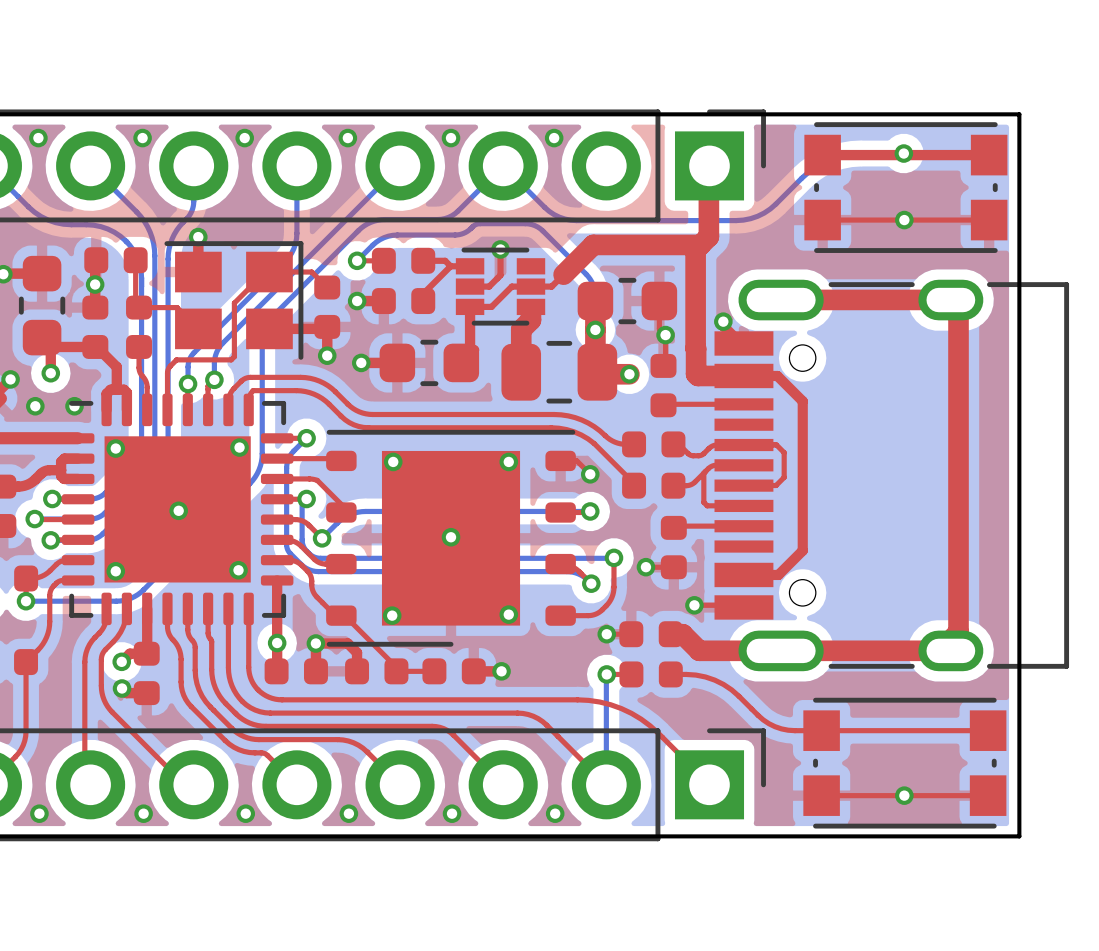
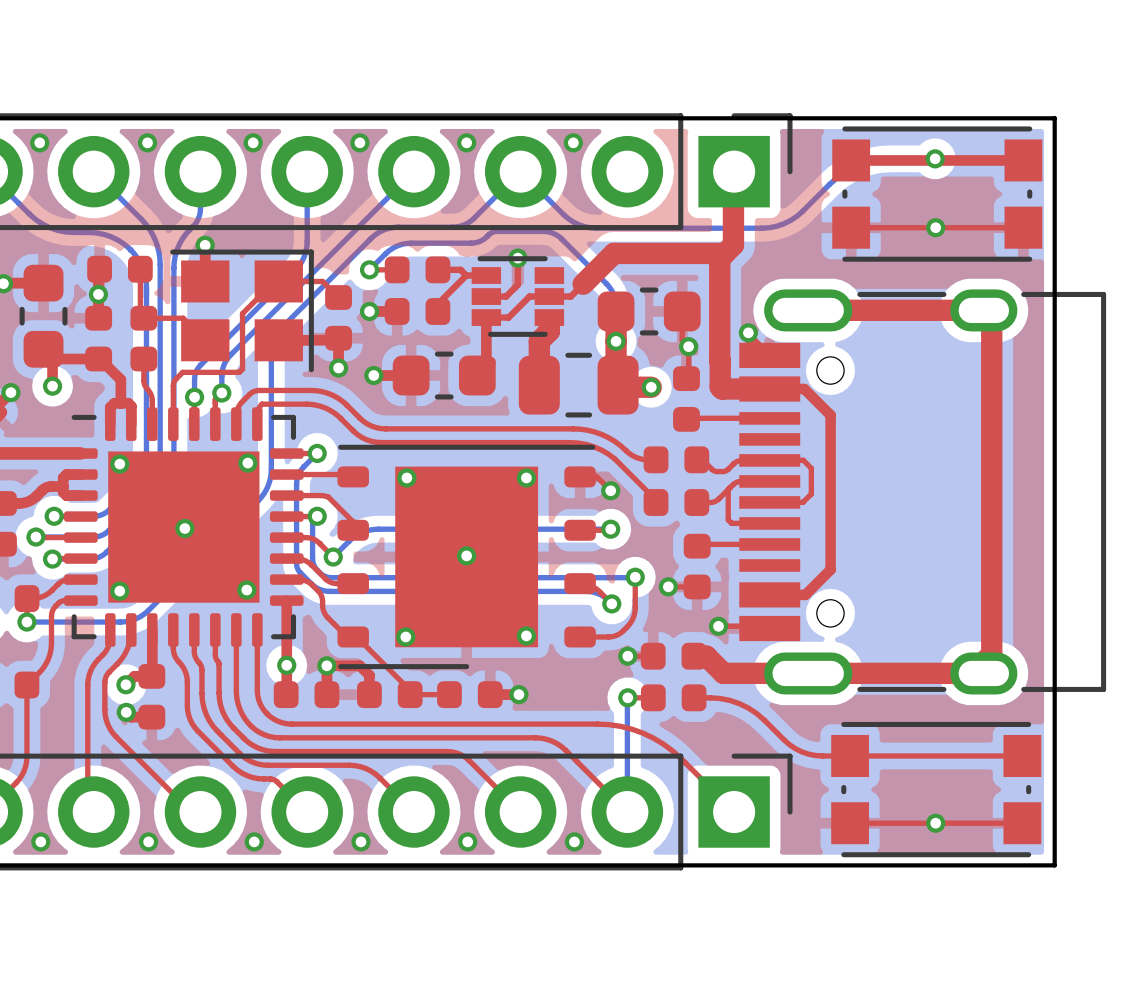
via: (35, 406) -> none
via: (74, 406) -> none

